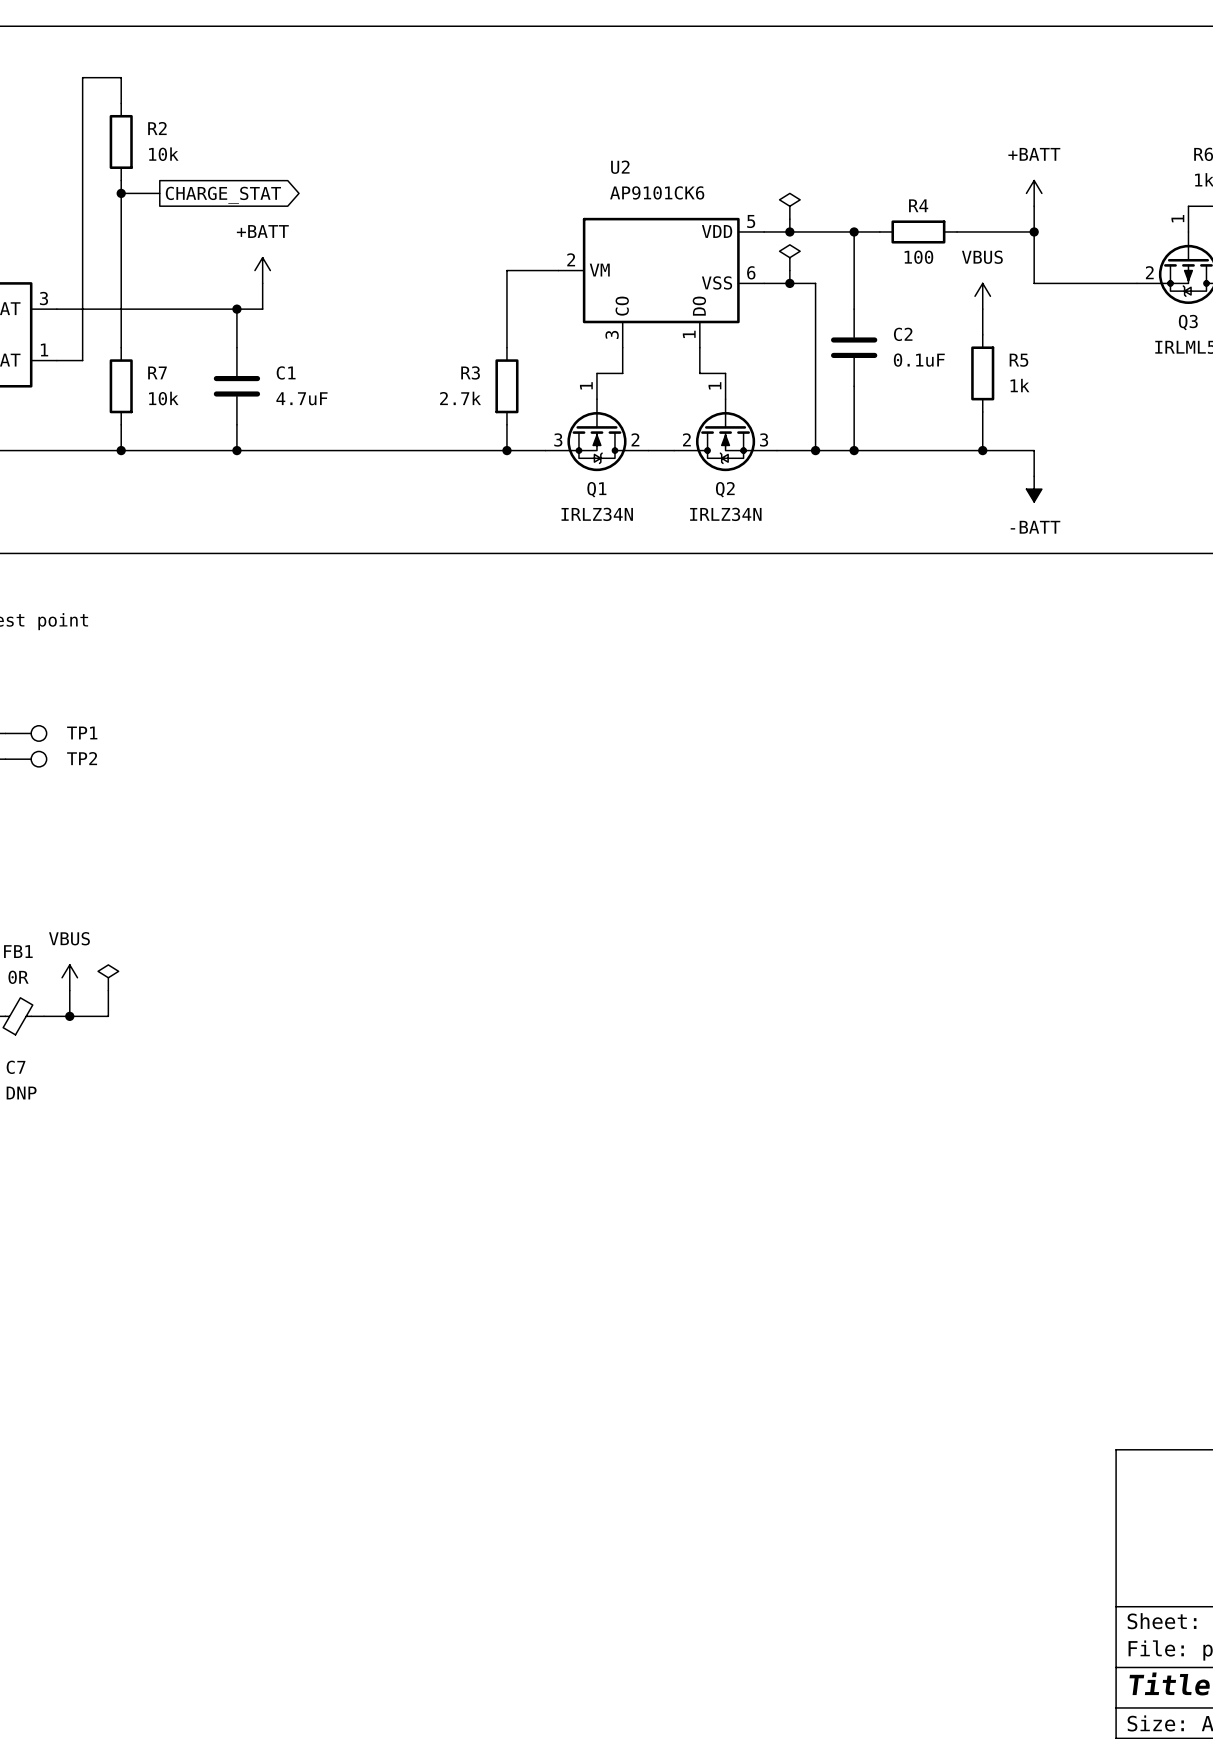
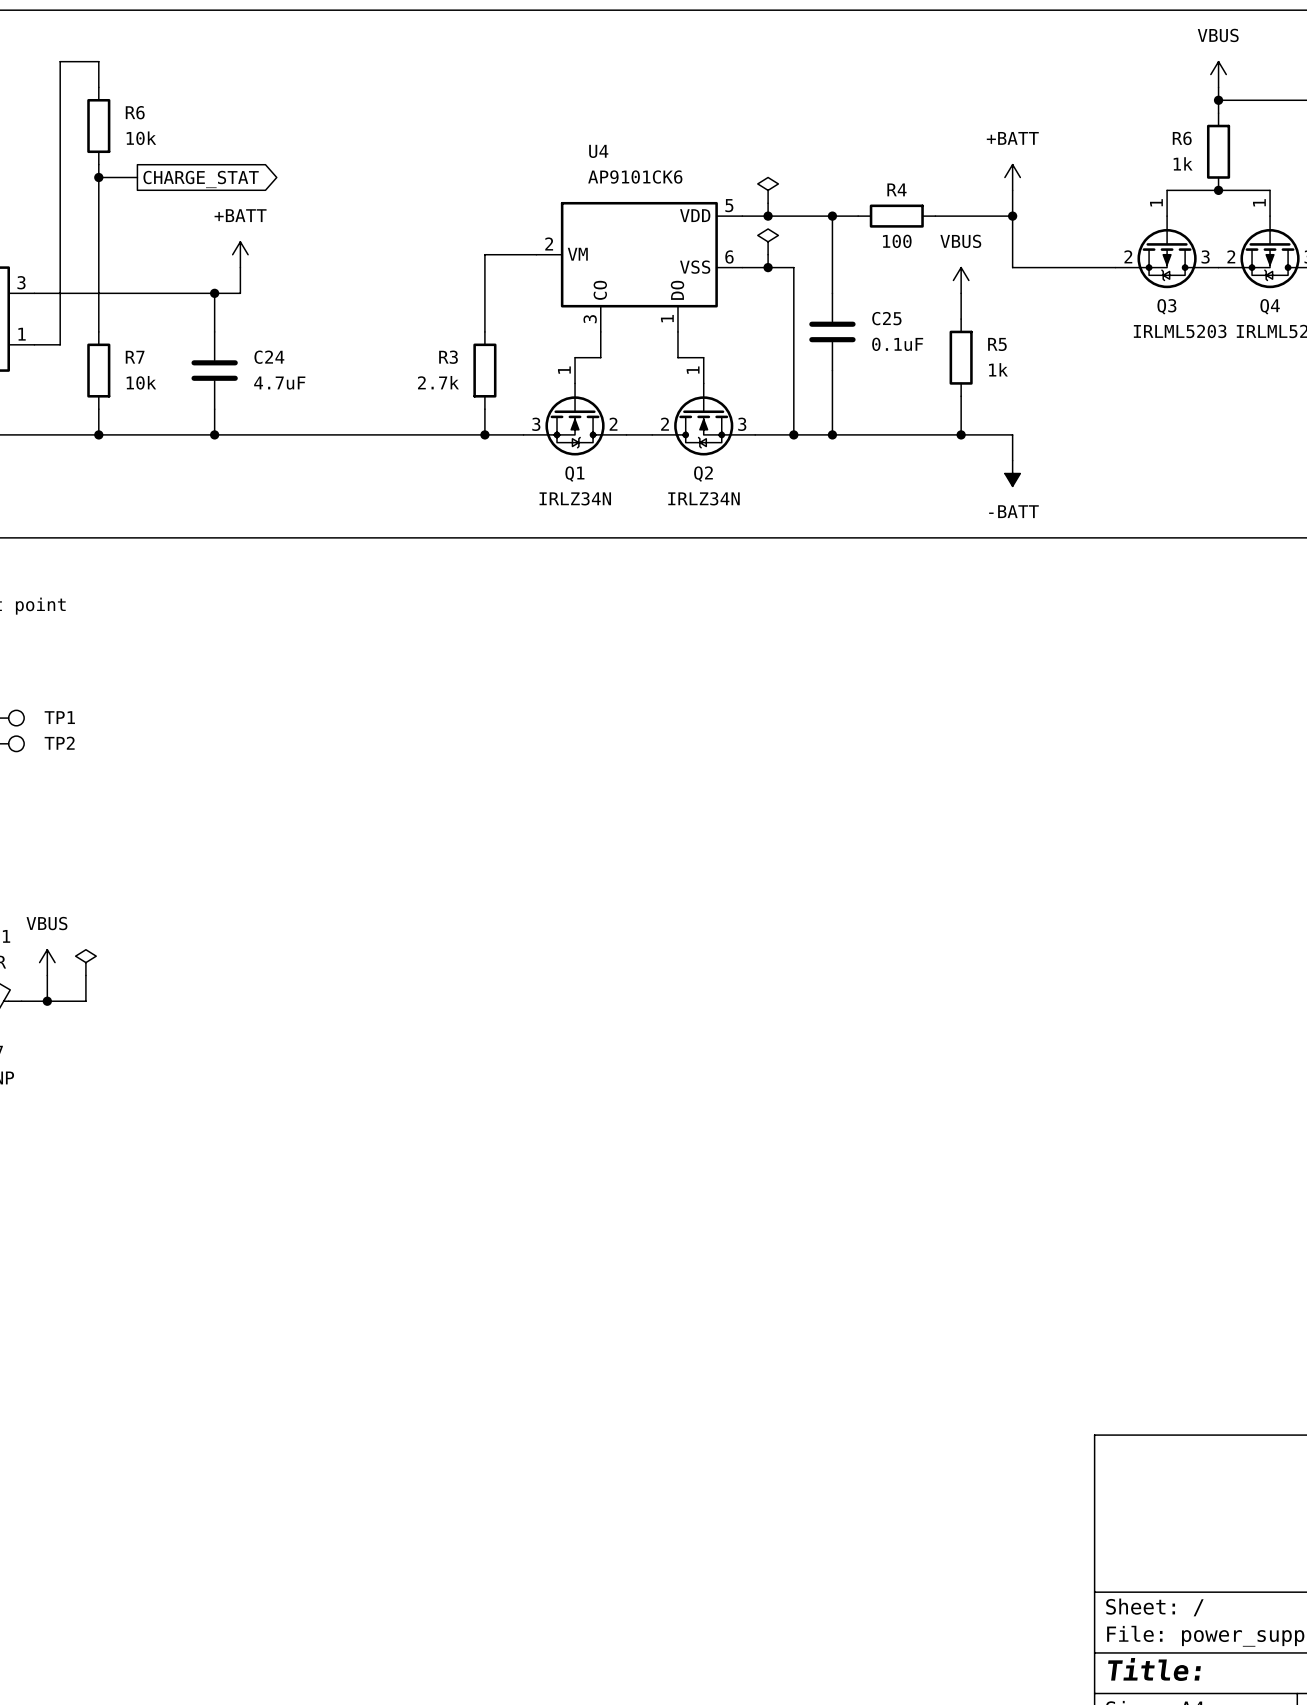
R2 name: R2 (157, 128) -> R6 (135, 112)
U2 name: U2 (620, 167) -> U4 (598, 151)
C2 name: C2 (903, 334) -> C25 (886, 318)
C1 name: C1 (286, 372) -> C24 (269, 357)

